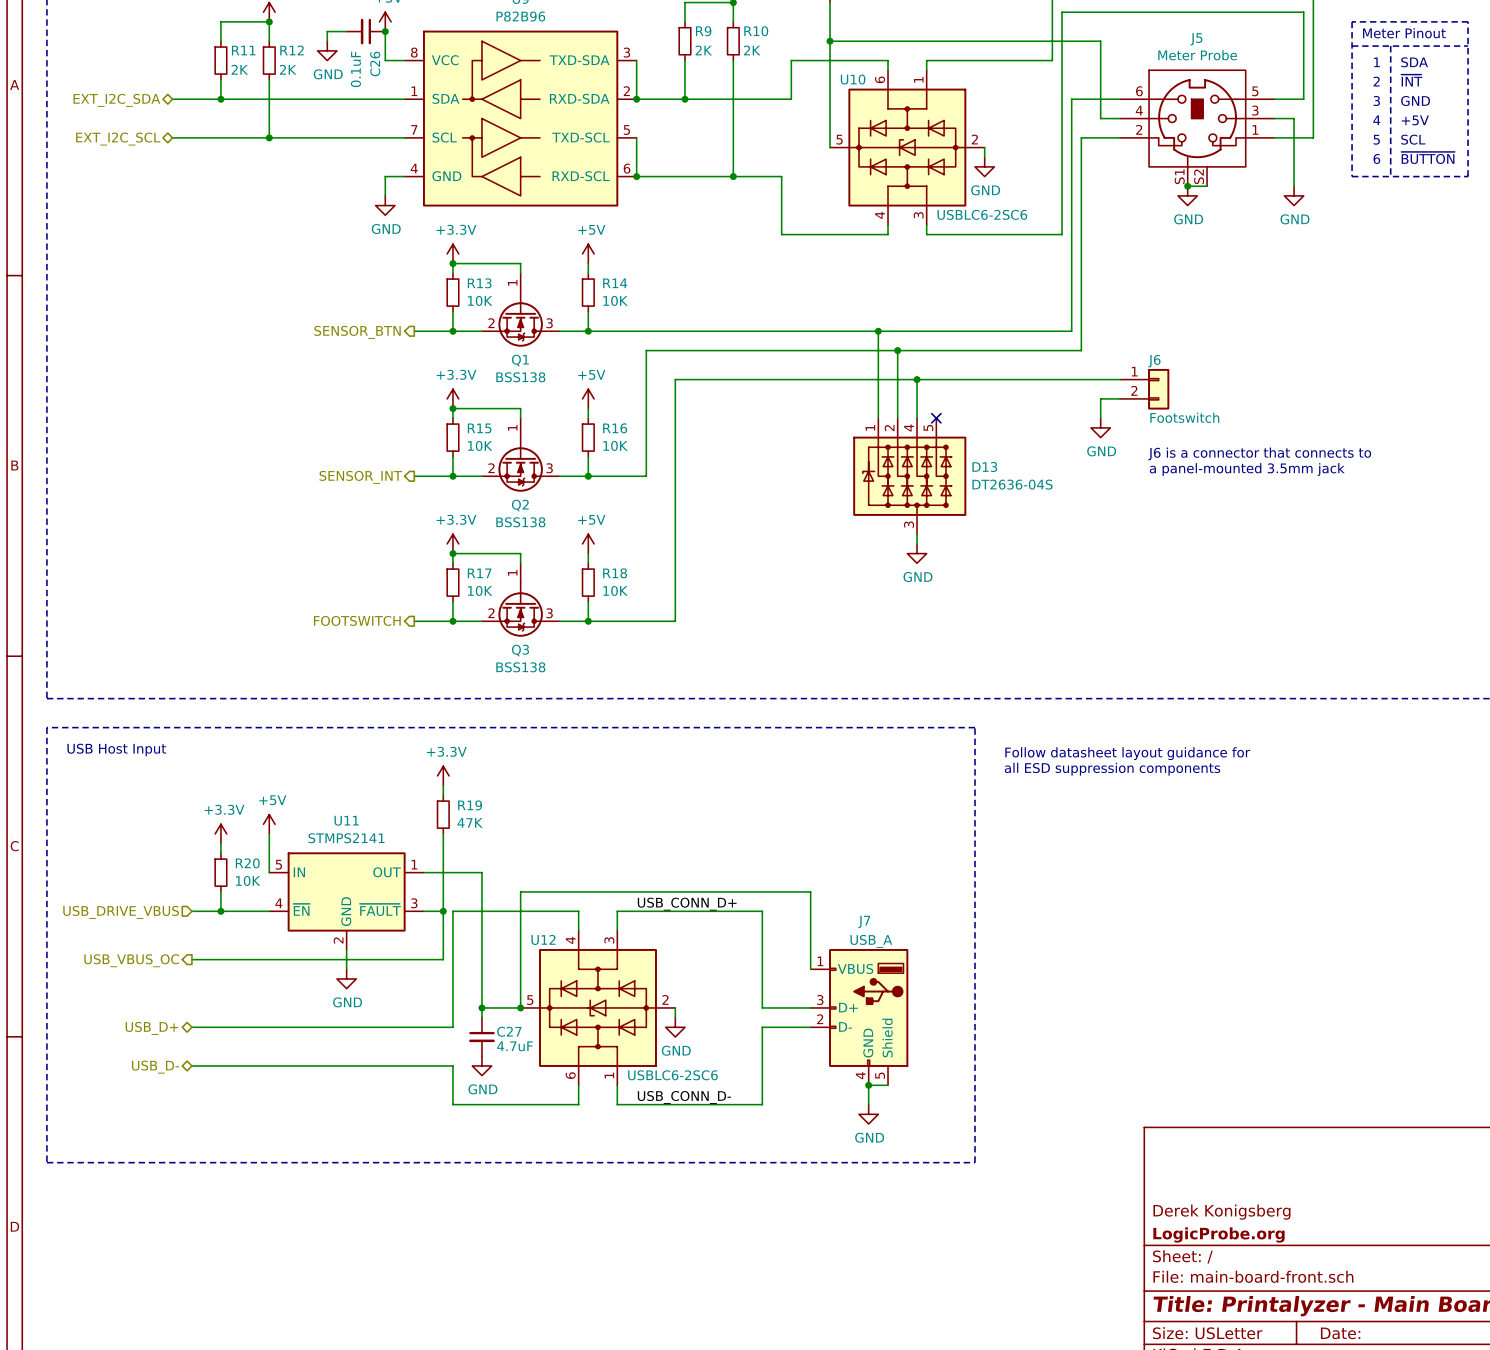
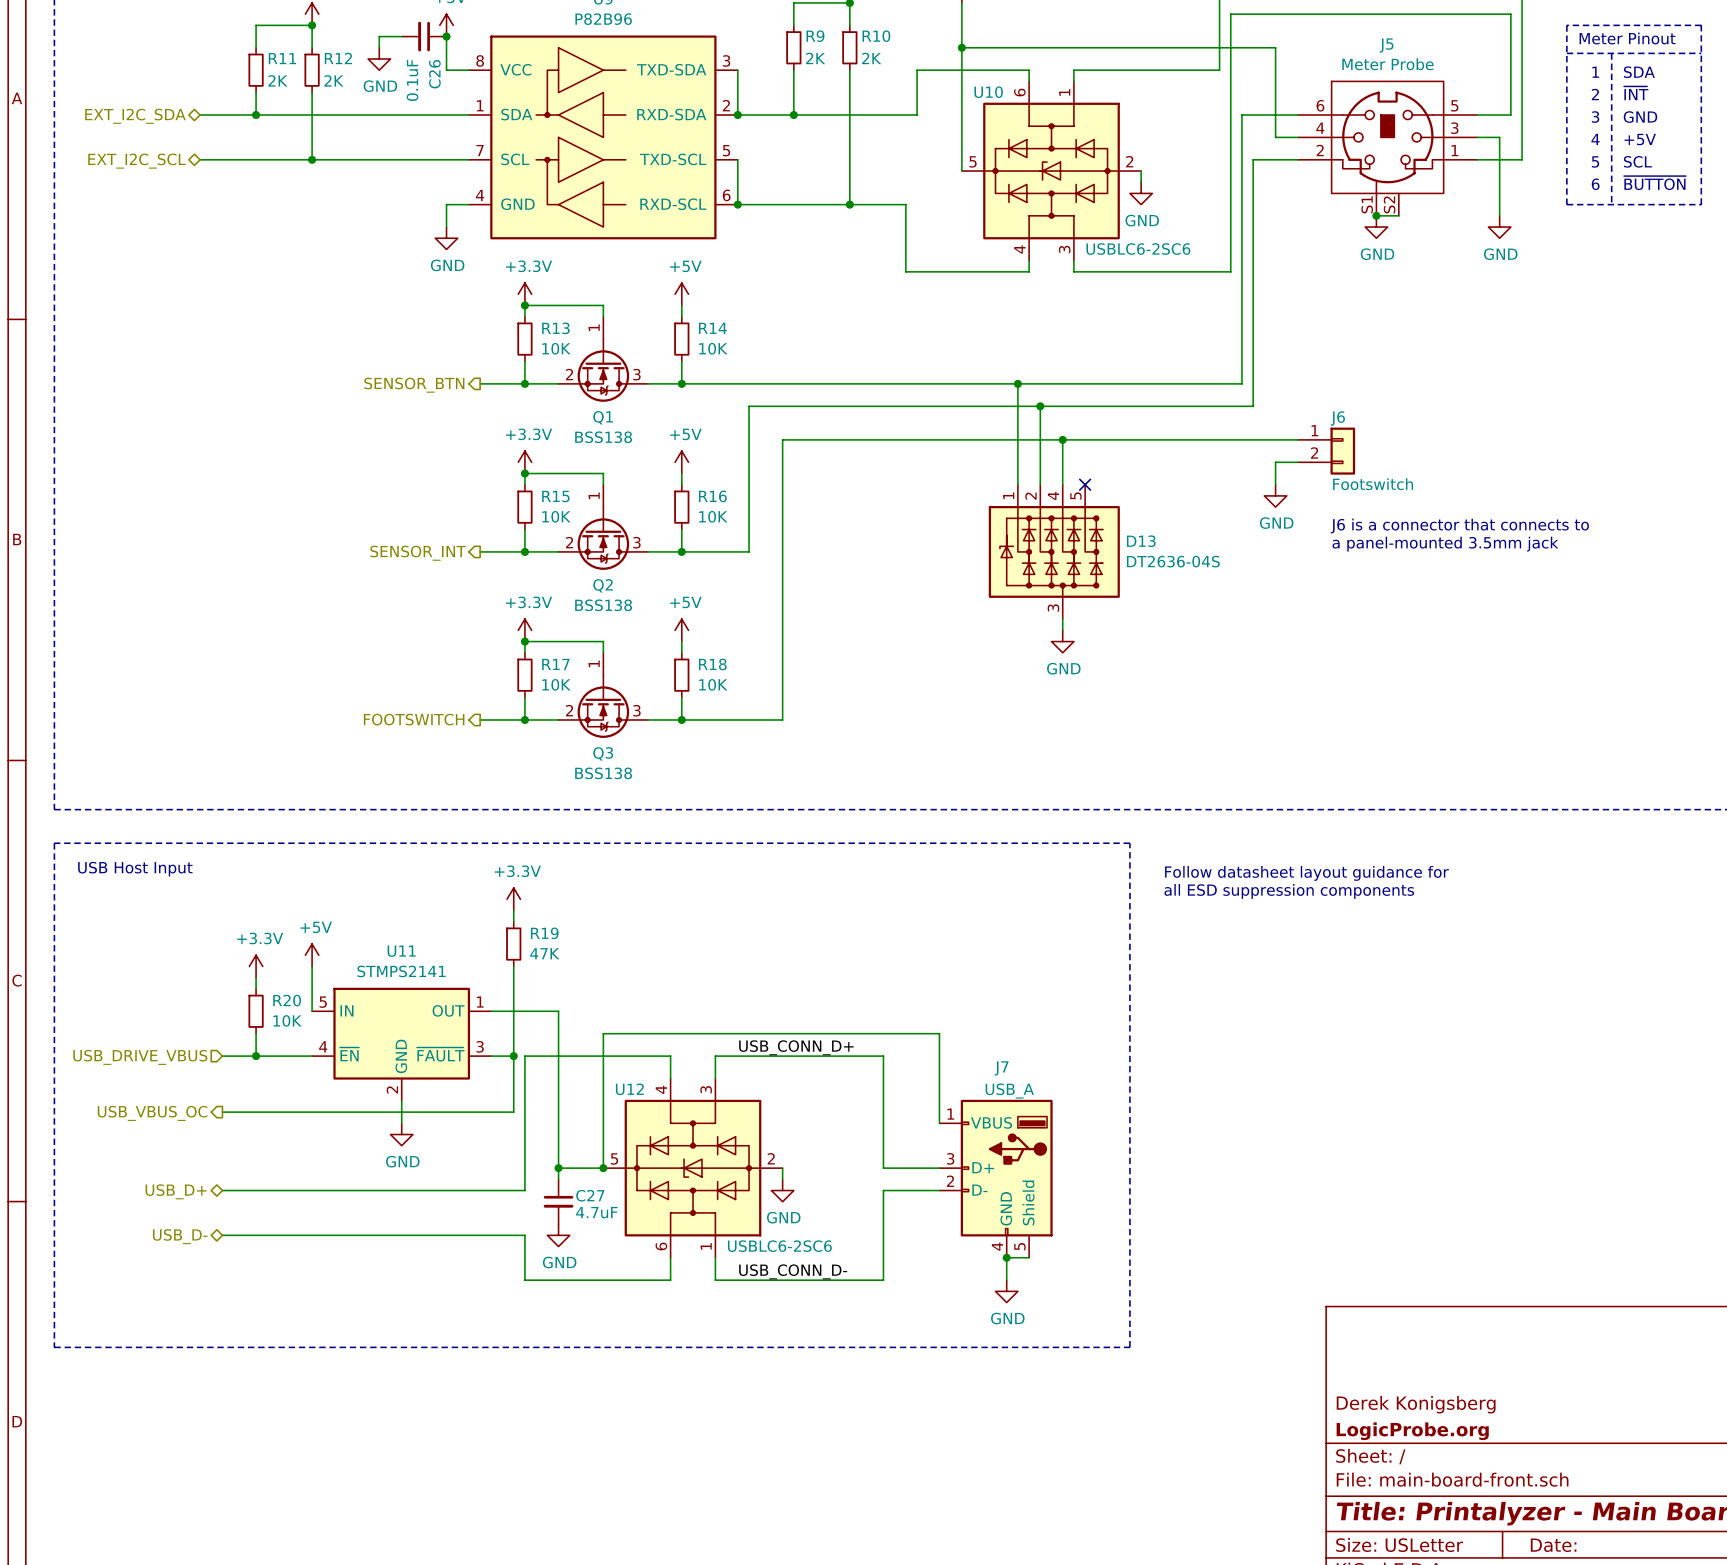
J5 text: Meter Probe (1197, 55) -> none
J5 value: none -> Meter Probe (1387, 64)

